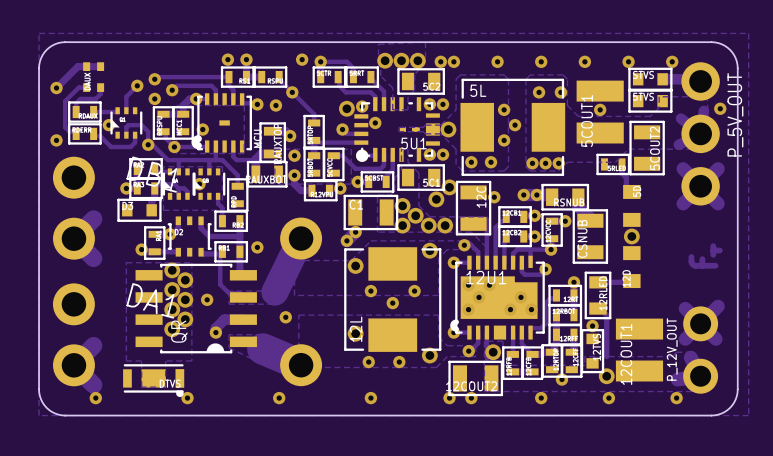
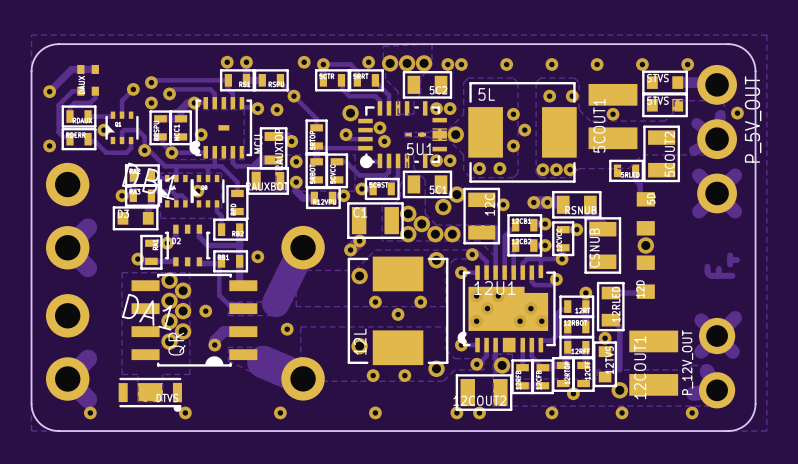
via: none -> (368, 62)
via: (362, 106) -> none
via: none -> (384, 141)

